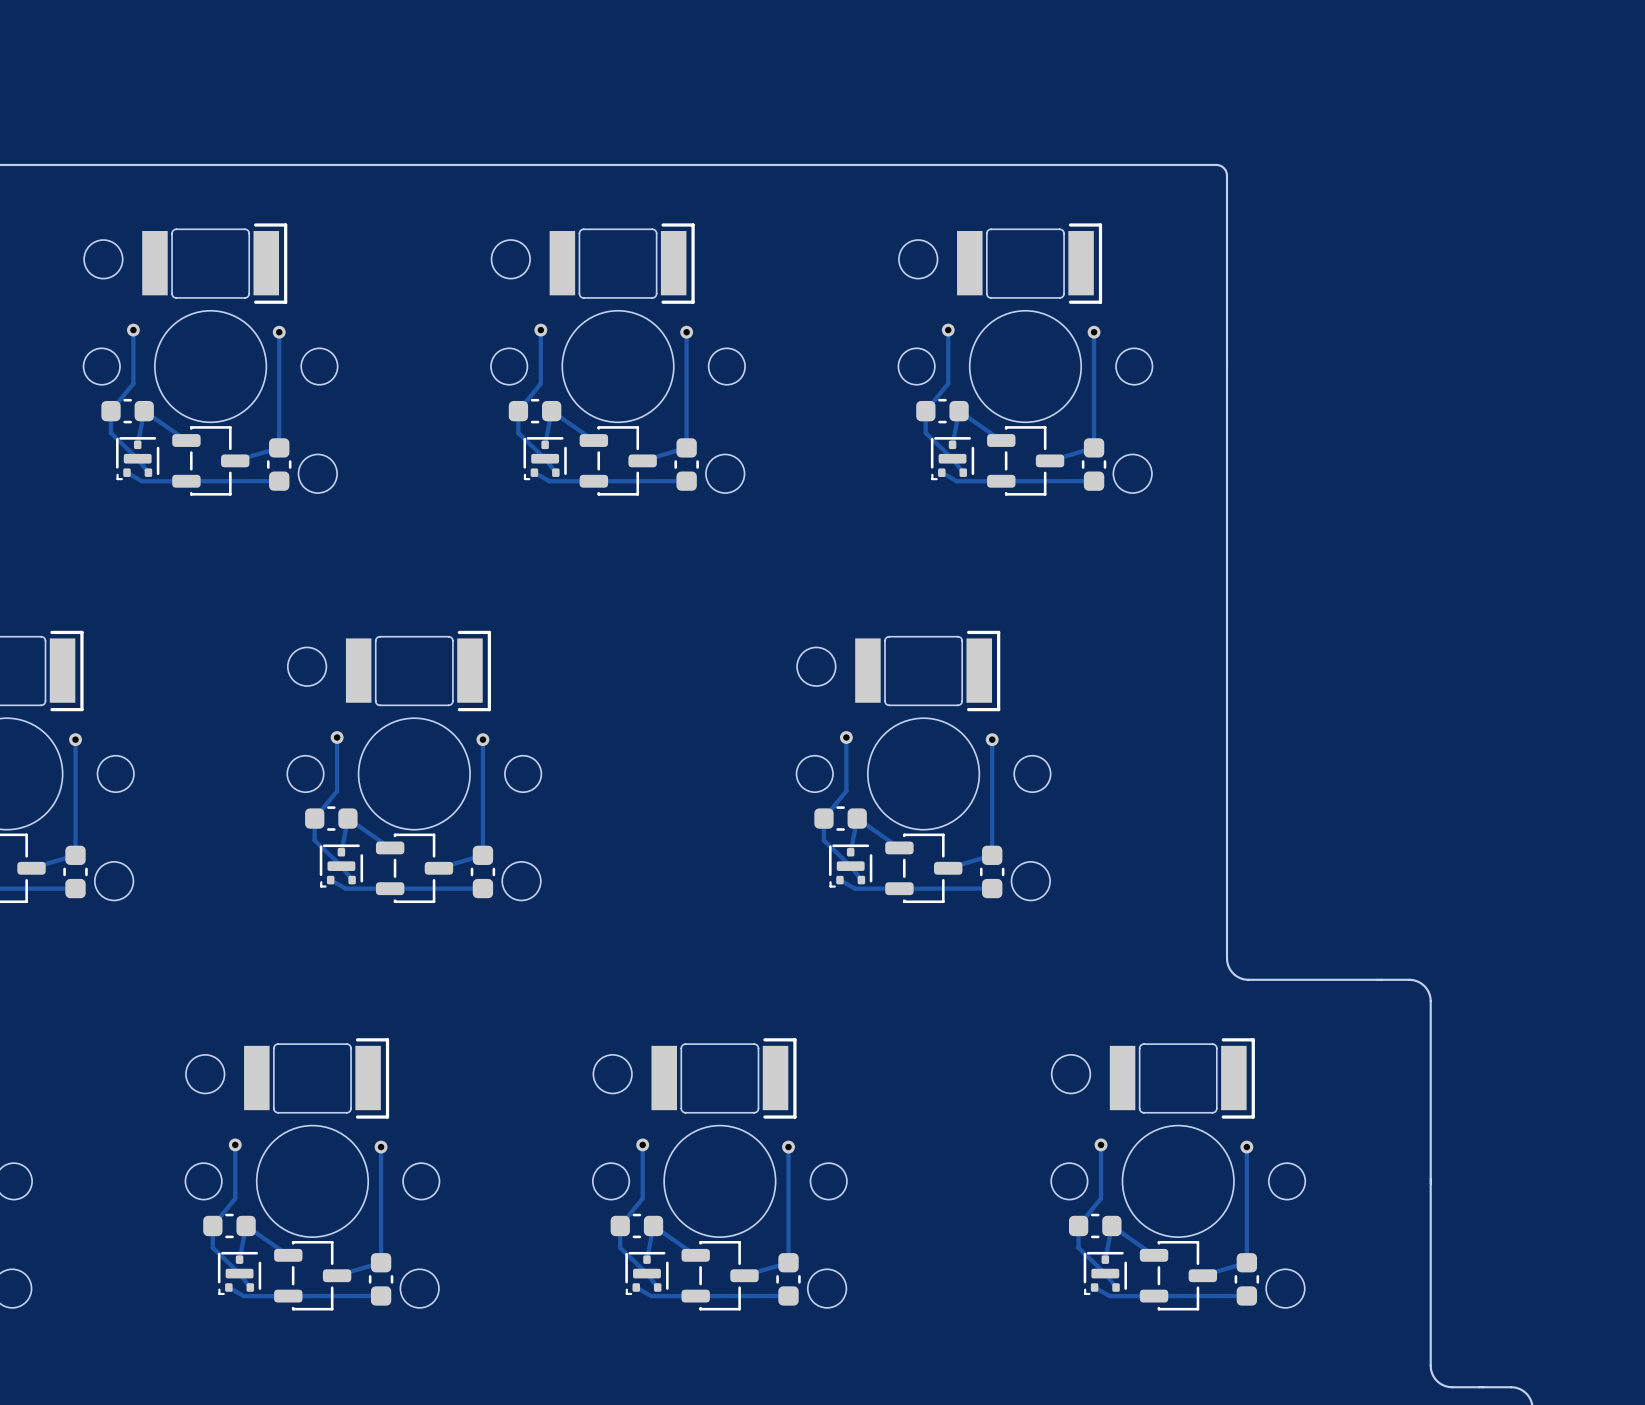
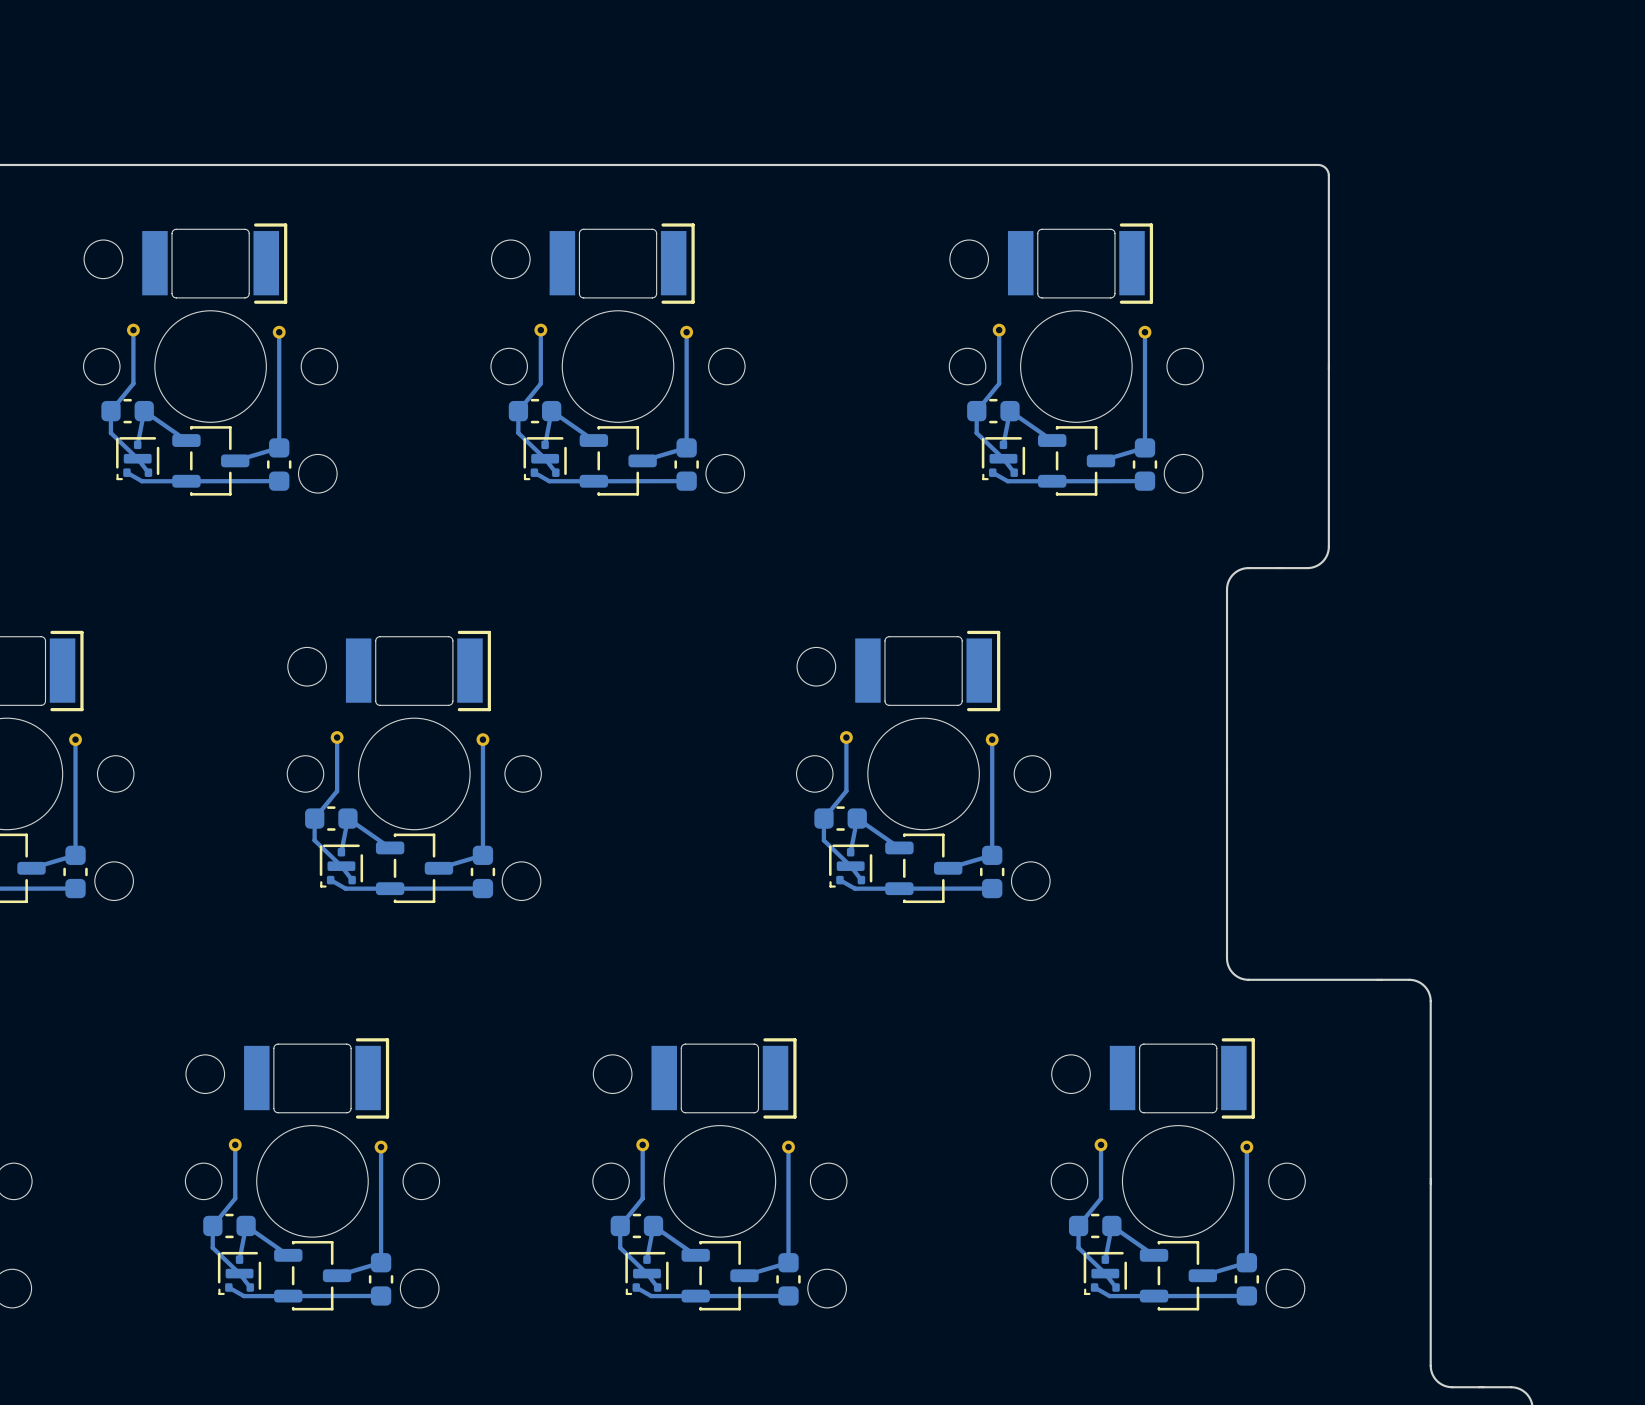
board edge: (1216, 164) (1223, 168) (1227, 175) (1227, 589) -> (1216, 164) (1319, 165) (1325, 168) (1328, 175) (1328, 551) (1322, 561) (1312, 567) (1241, 569) (1231, 576) (1227, 589)
part position: (1025, 359) -> (1076, 359)

